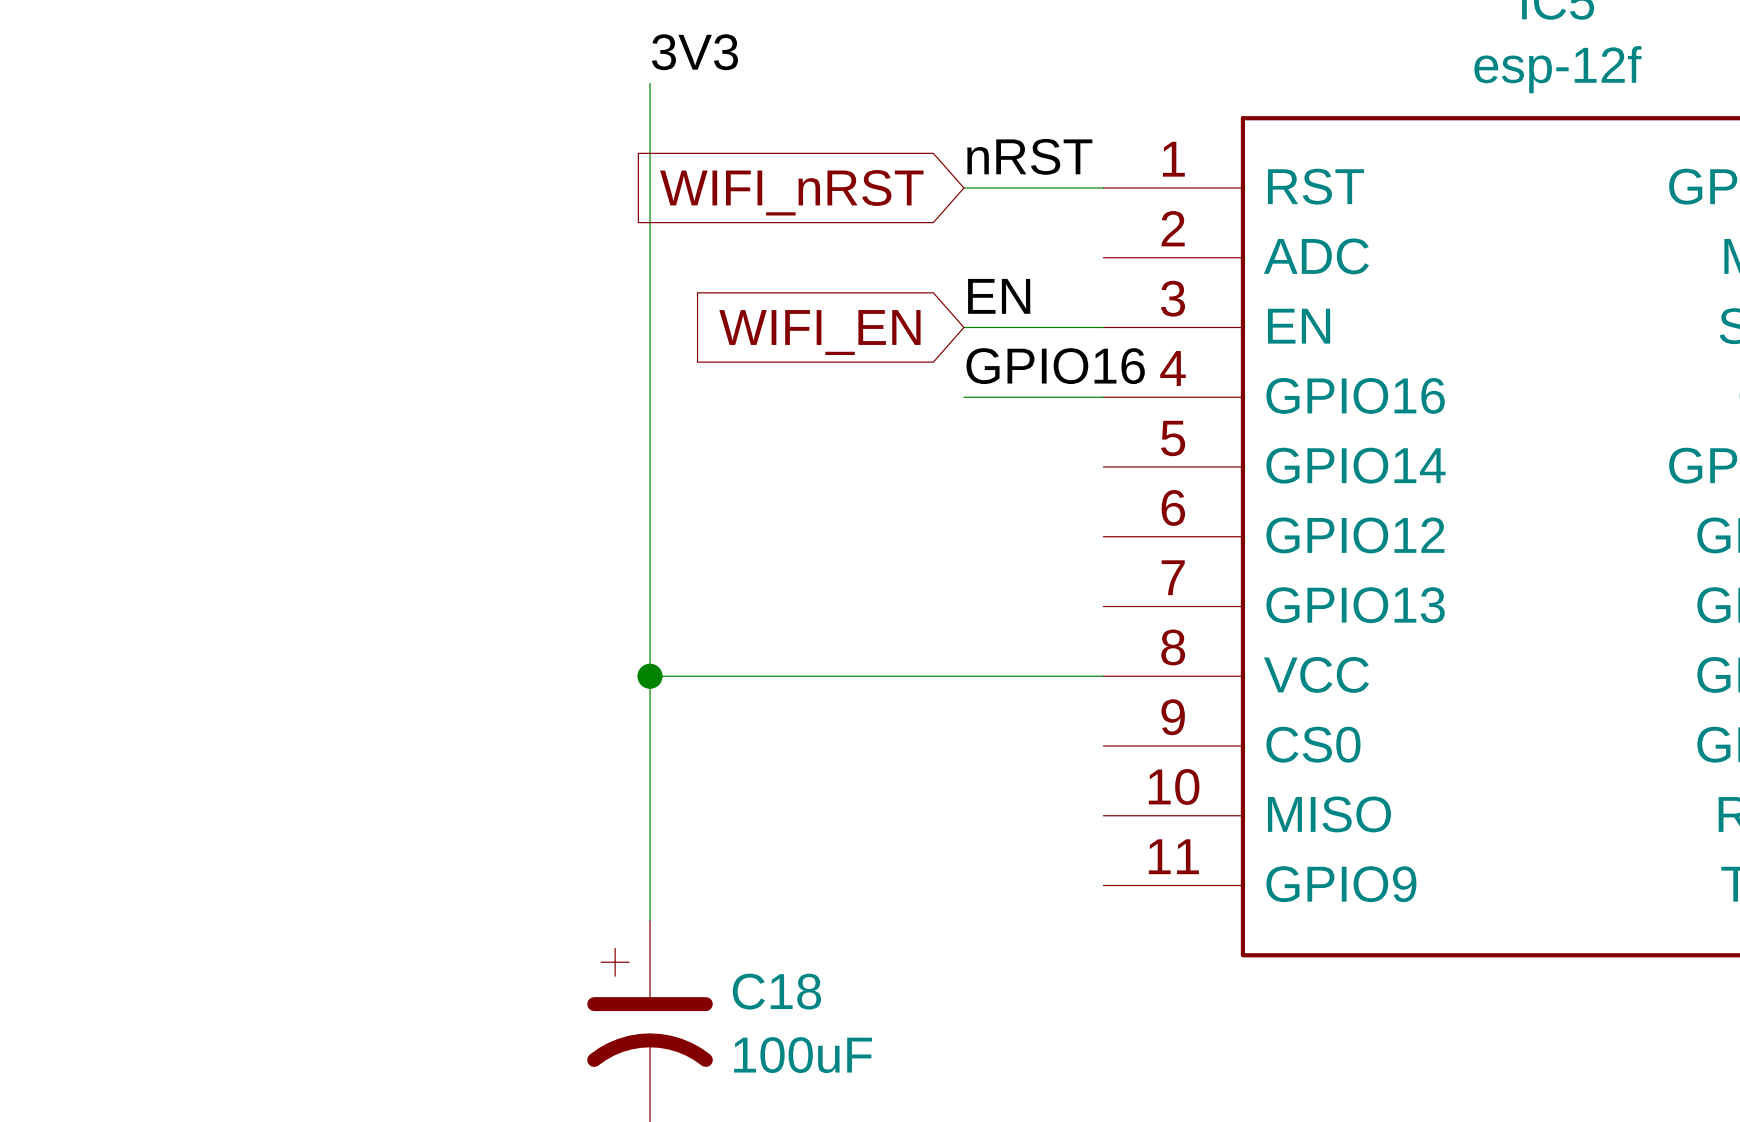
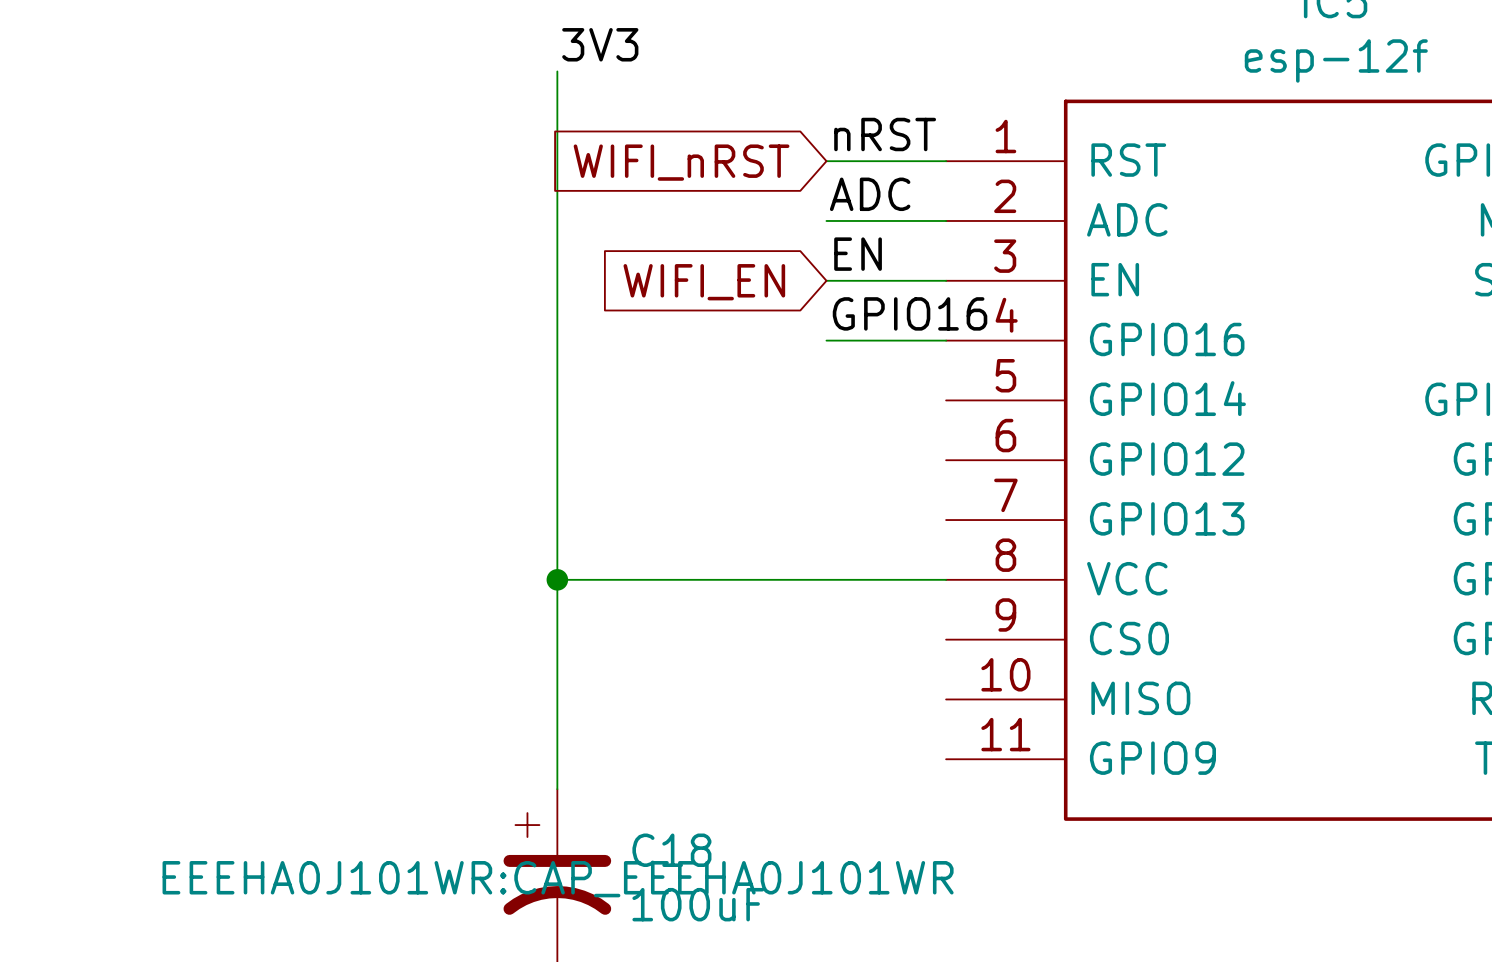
label: none -> ADC (870, 194)
wire: none -> (826, 220) (946, 220)
C18 text: none -> EEEHA0J101WR:CAP_EEEHA0J101WR (558, 879)

